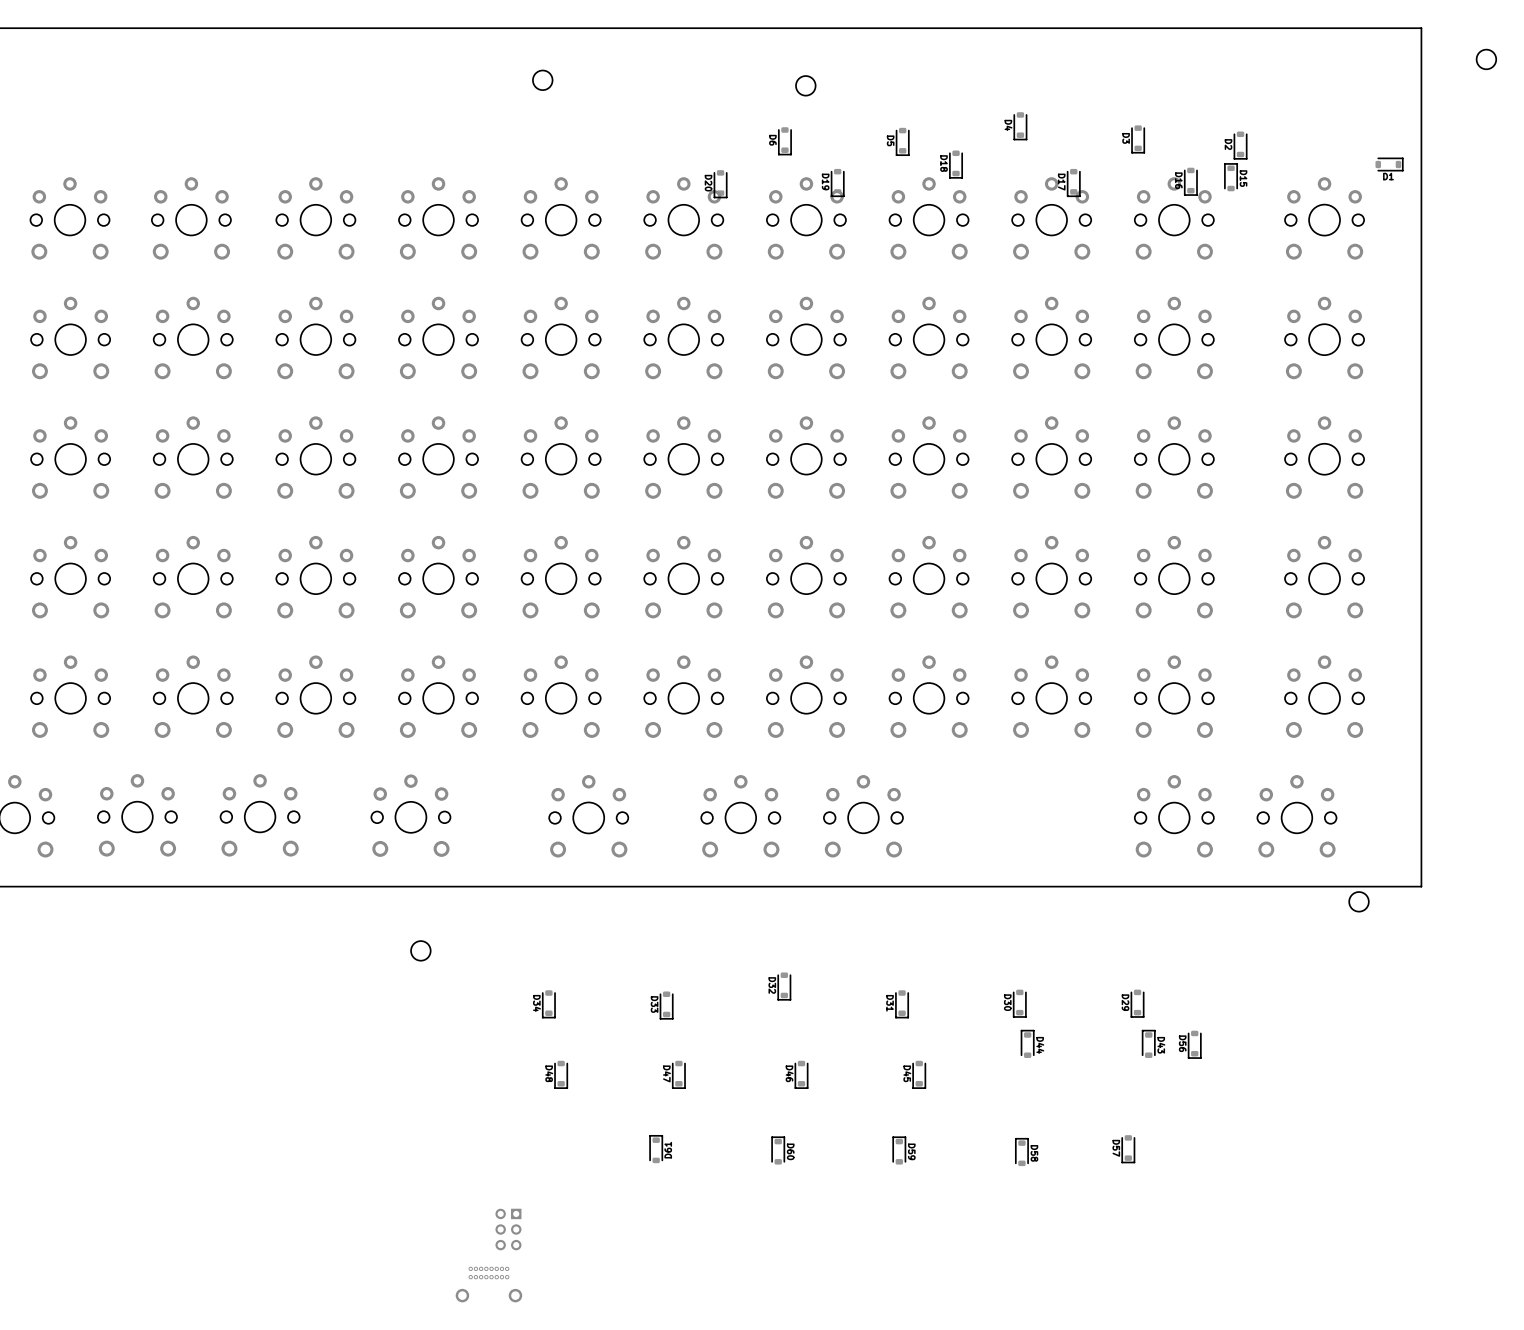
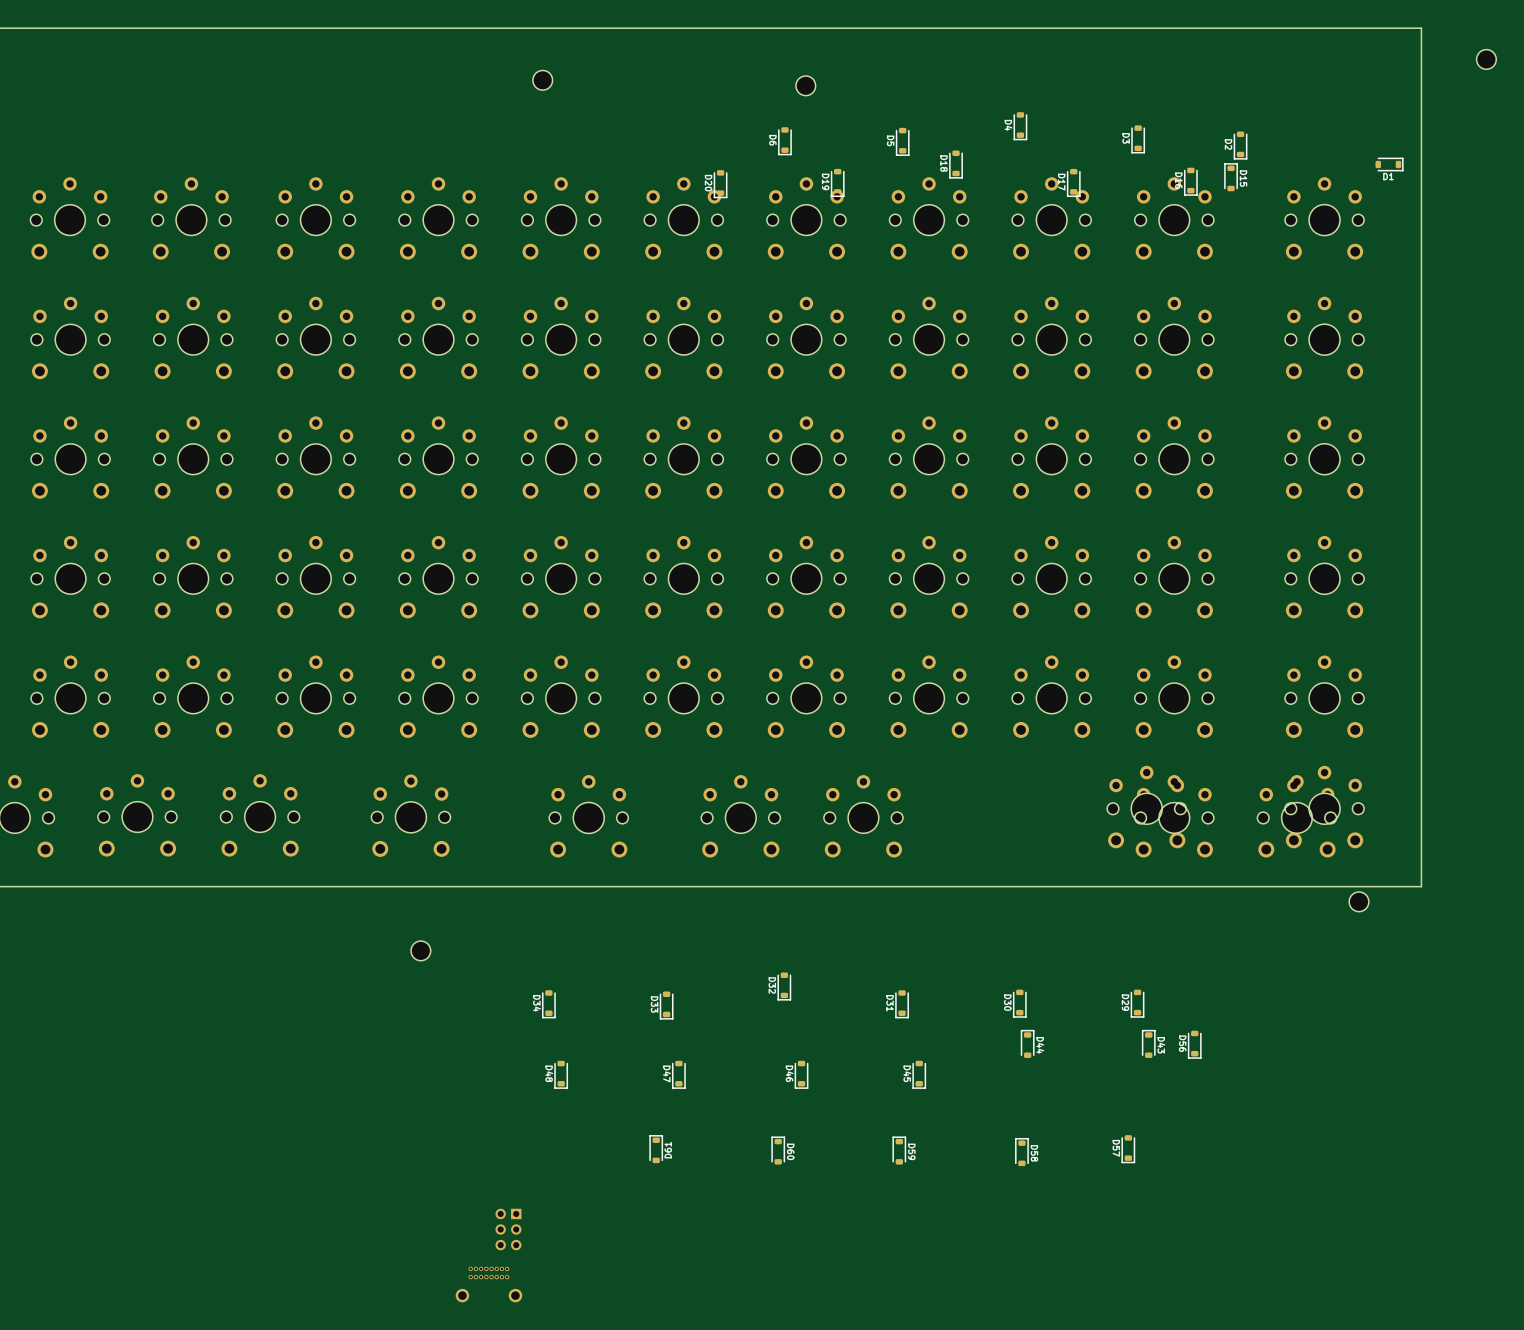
part: none -> (1146, 807)
part: none -> (1324, 807)

